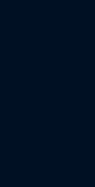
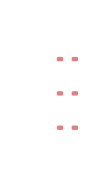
part: none -> (67, 59)
part: none -> (67, 93)
part: none -> (67, 127)

